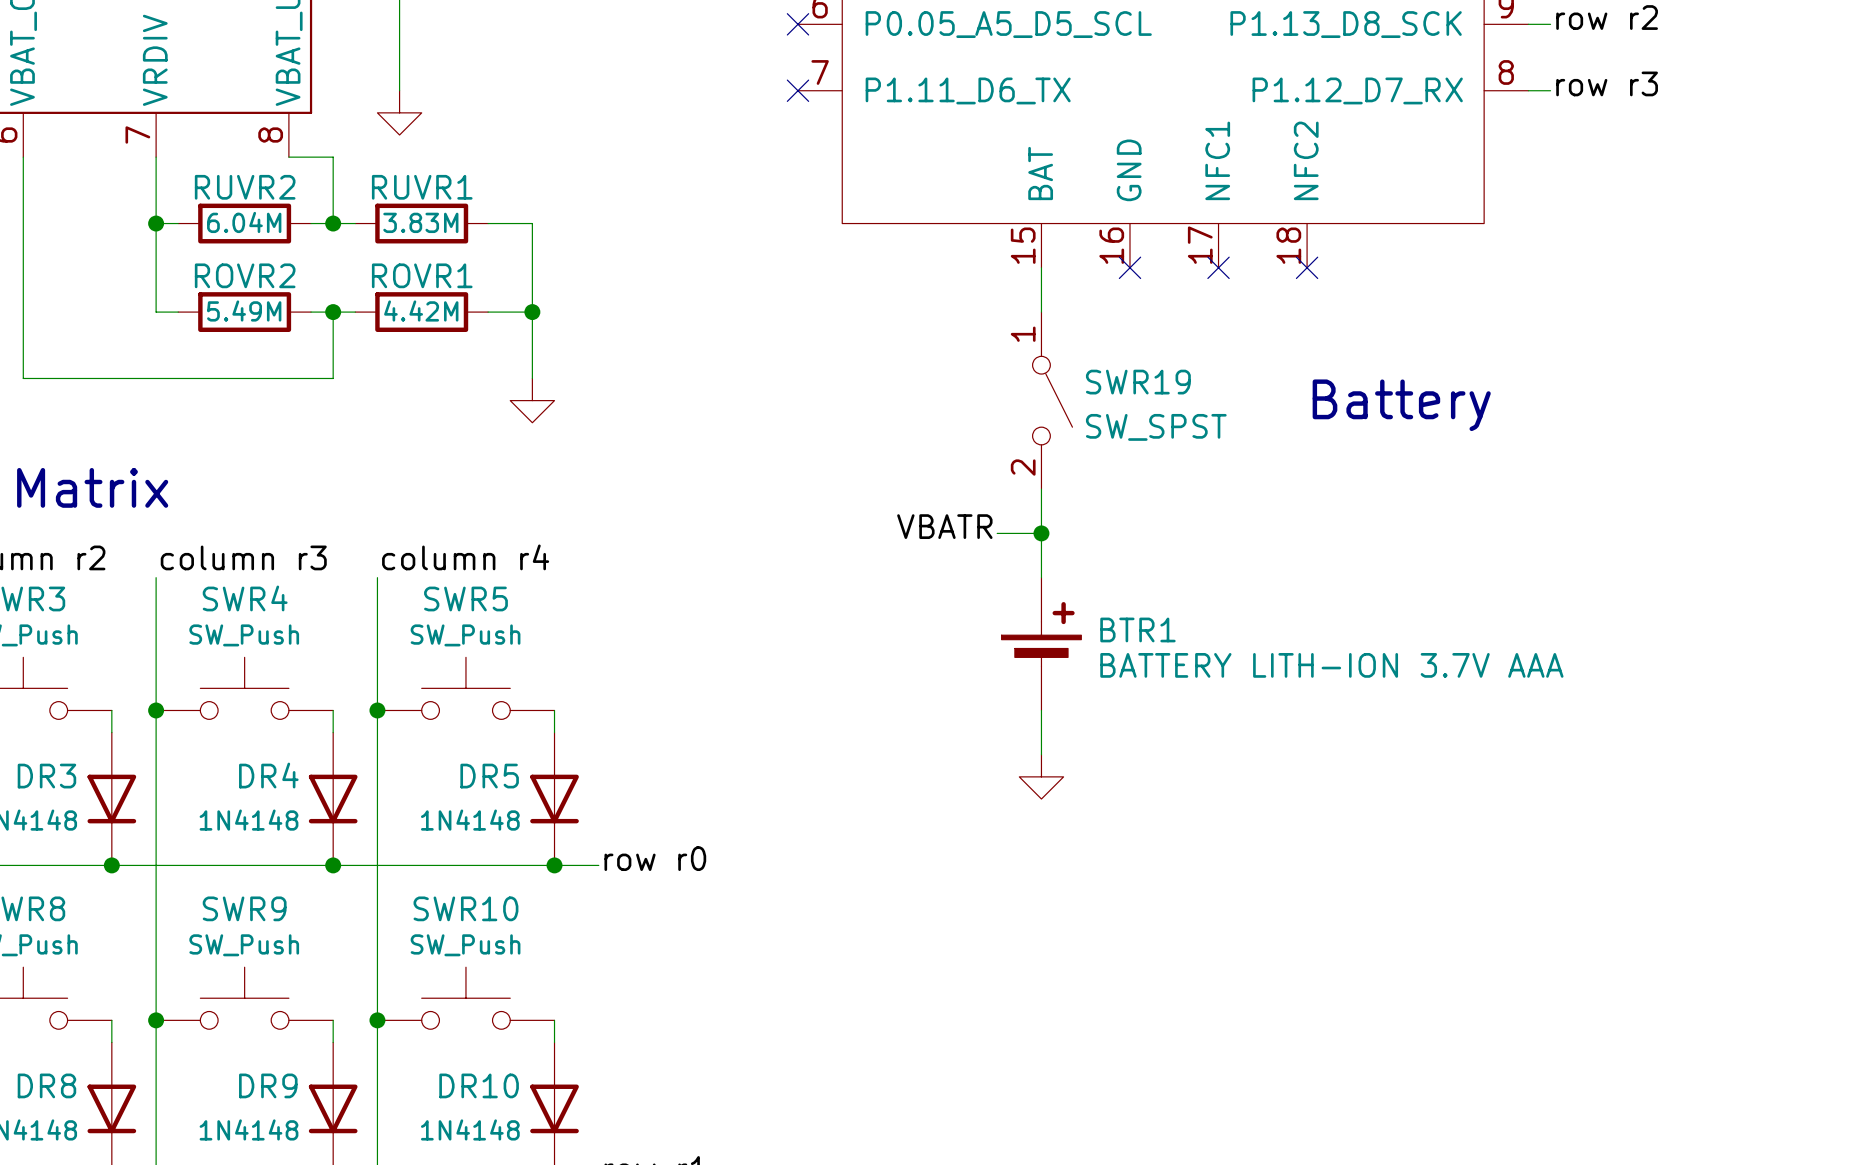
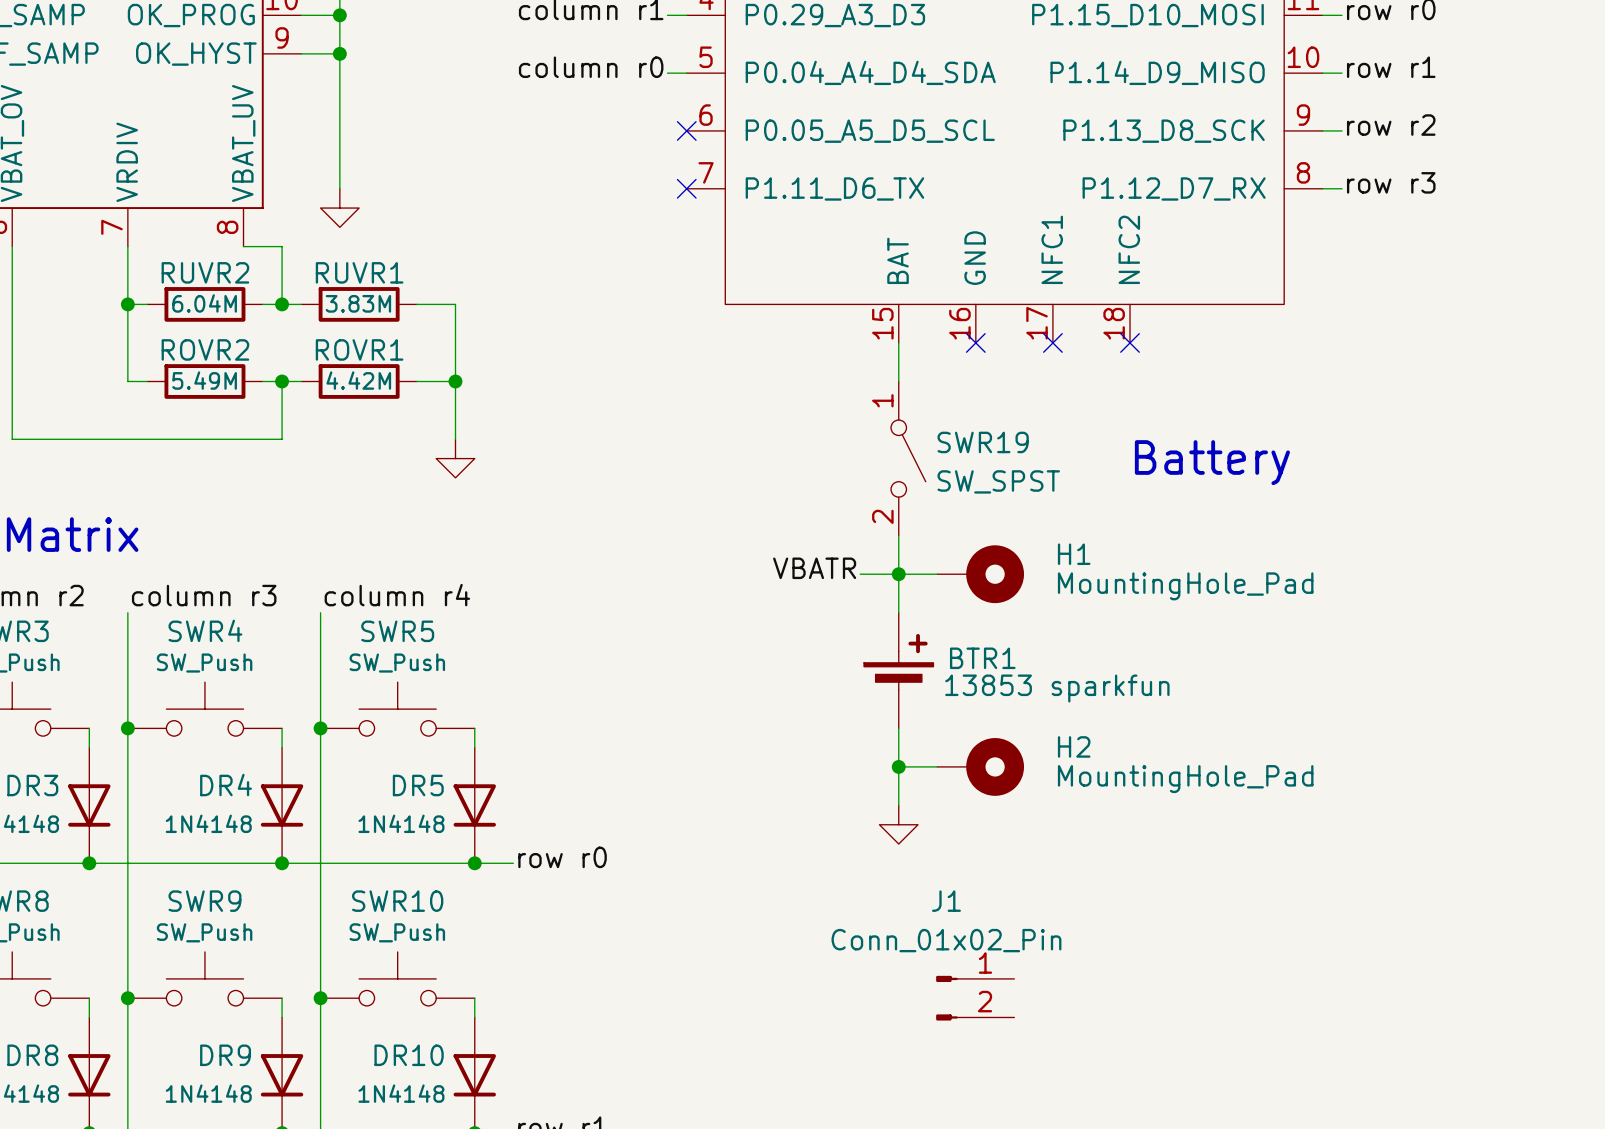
wire: none -> (898, 574) (937, 574)
H1: none -> MountingHole_Pad (980, 574)
BTR1 value: BATTERY LITH-ION 3.7V AAA (1331, 665) -> 13853 sparkfun (1057, 688)
junction: none -> (898, 766)
wire: none -> (937, 766) (898, 766) (898, 805)
H2: none -> MountingHole_Pad (980, 766)
power symbol position: (1041, 776) -> (898, 824)
J1: none -> Conn_01x02_Pin (975, 998)

